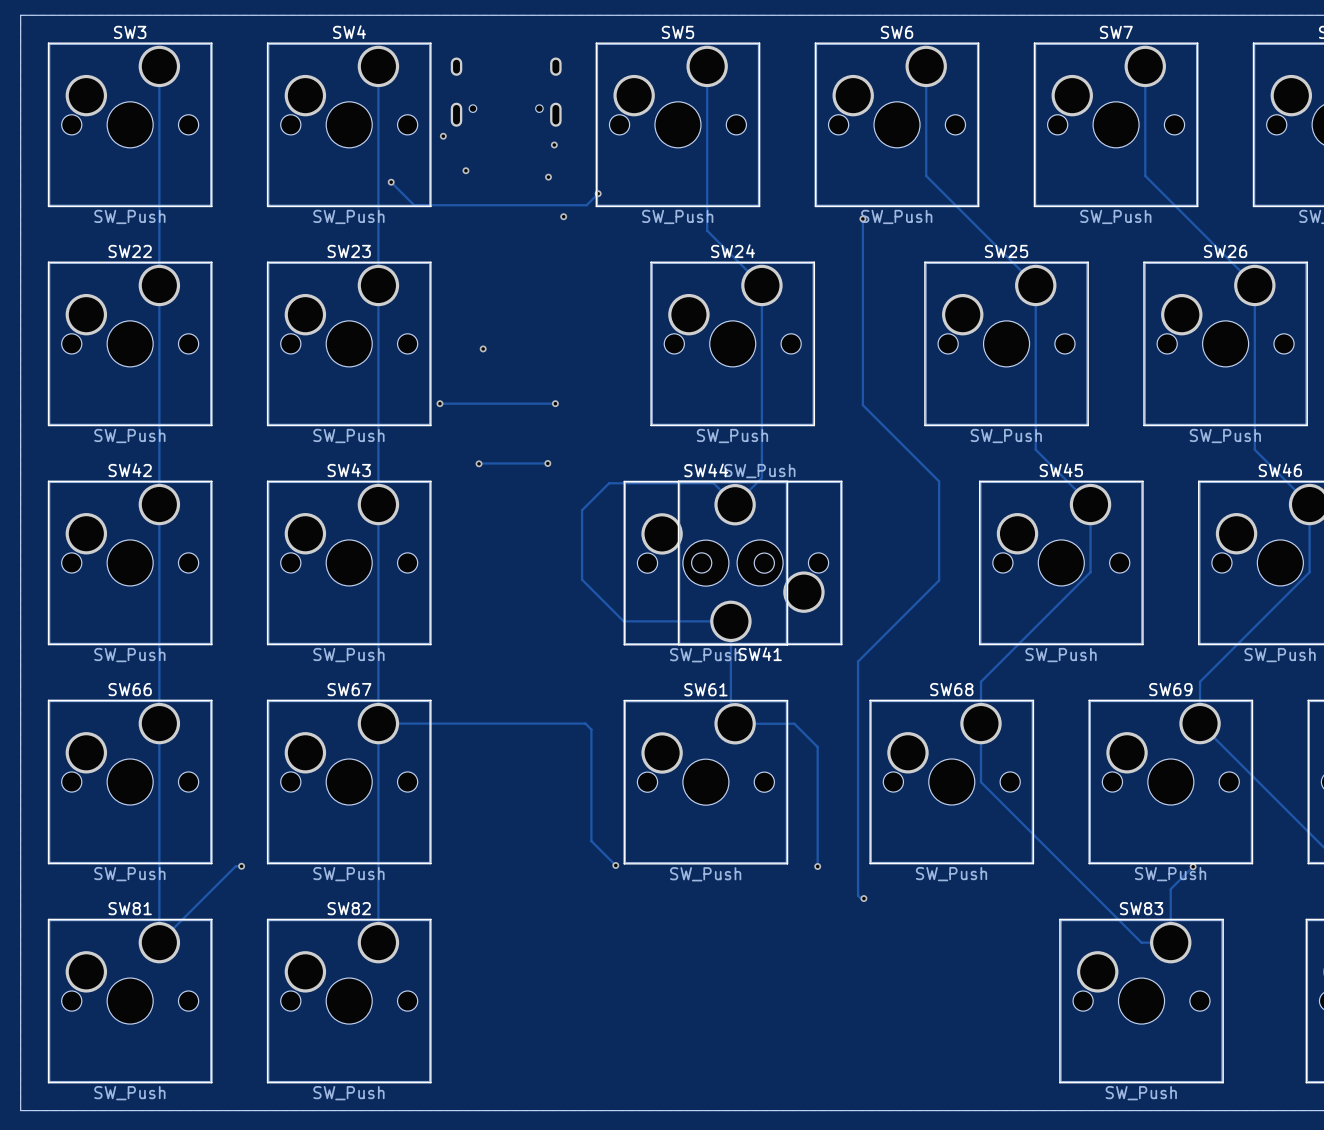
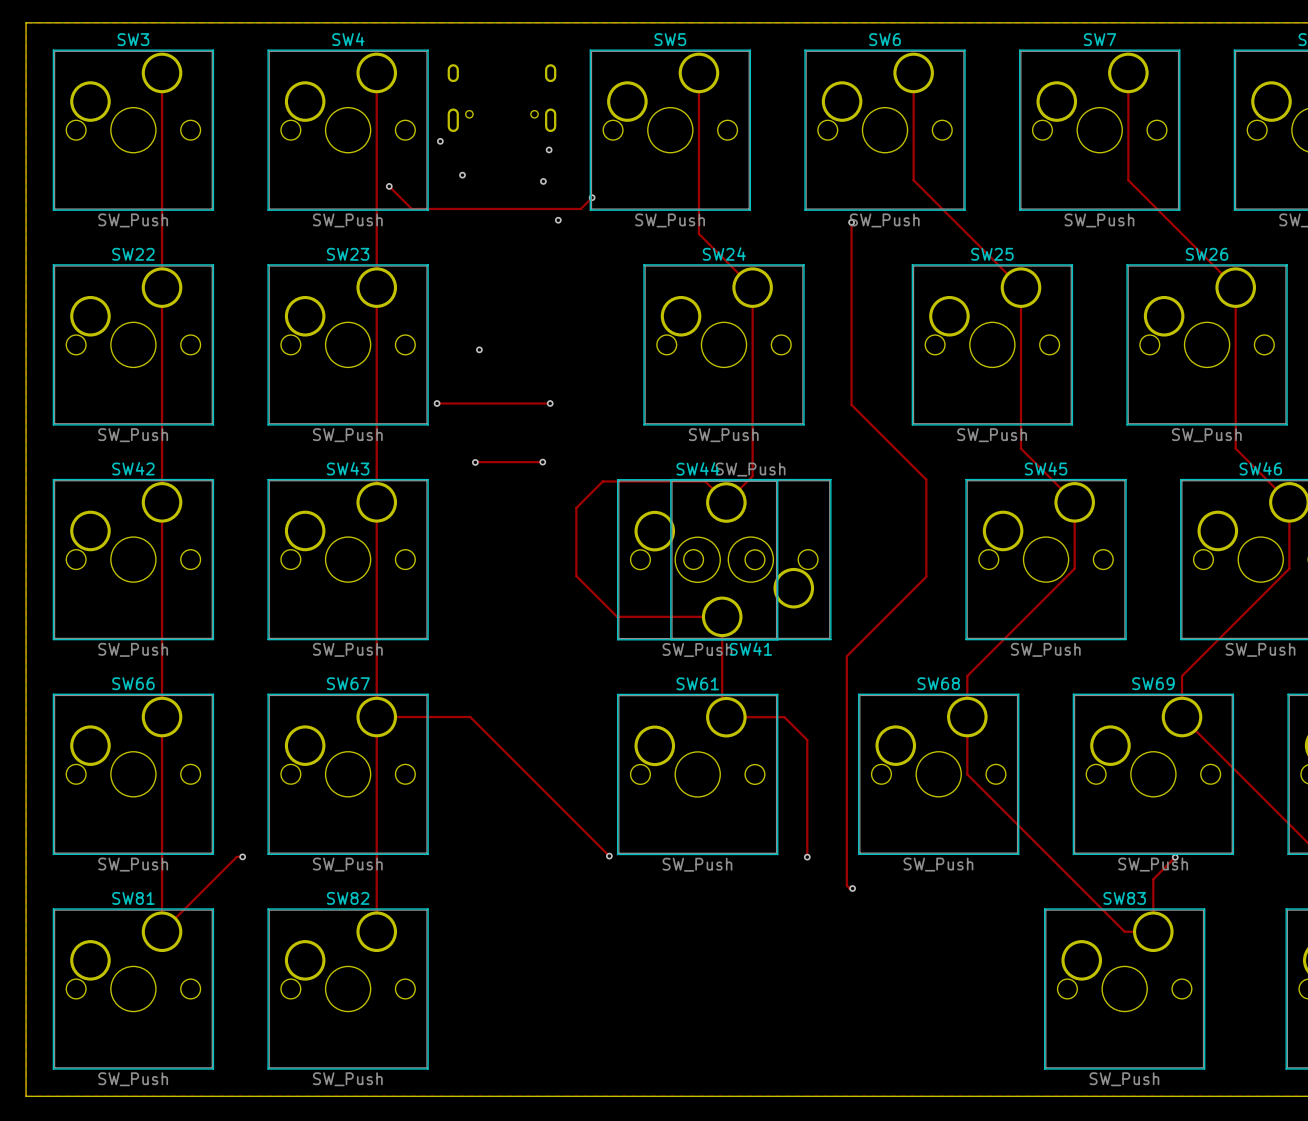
track: (473, 723) (585, 723) (591, 729) (591, 841) -> (470, 717) (585, 832)

